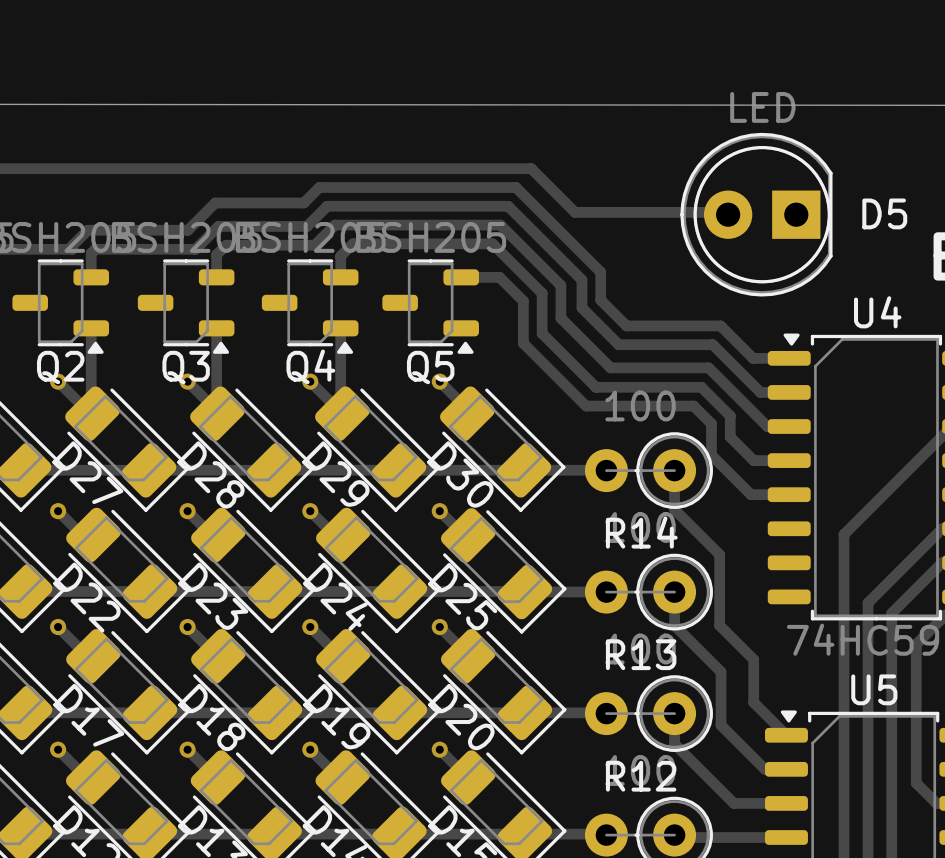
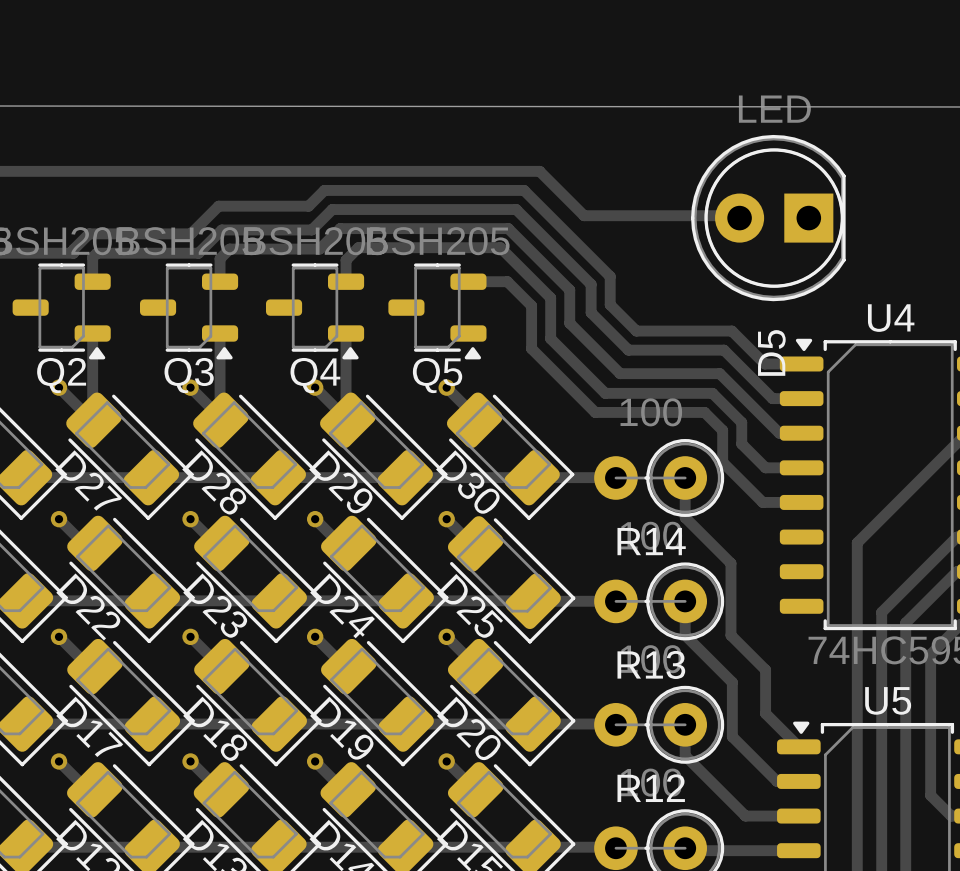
D5 name rotation: 0° (884, 213) -> 90° counterclockwise (771, 352)
D5 name position: D5 (884, 213) -> D5 (771, 352)

